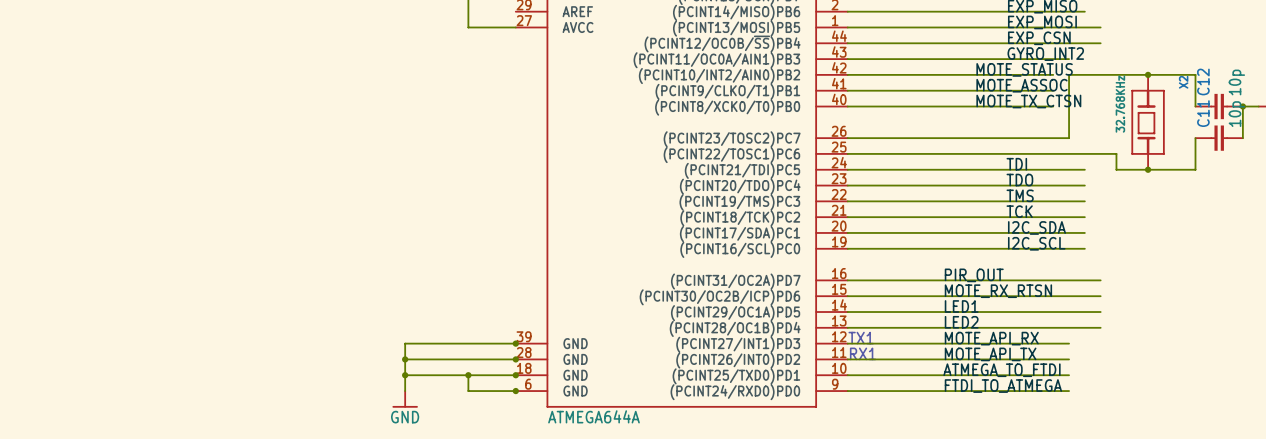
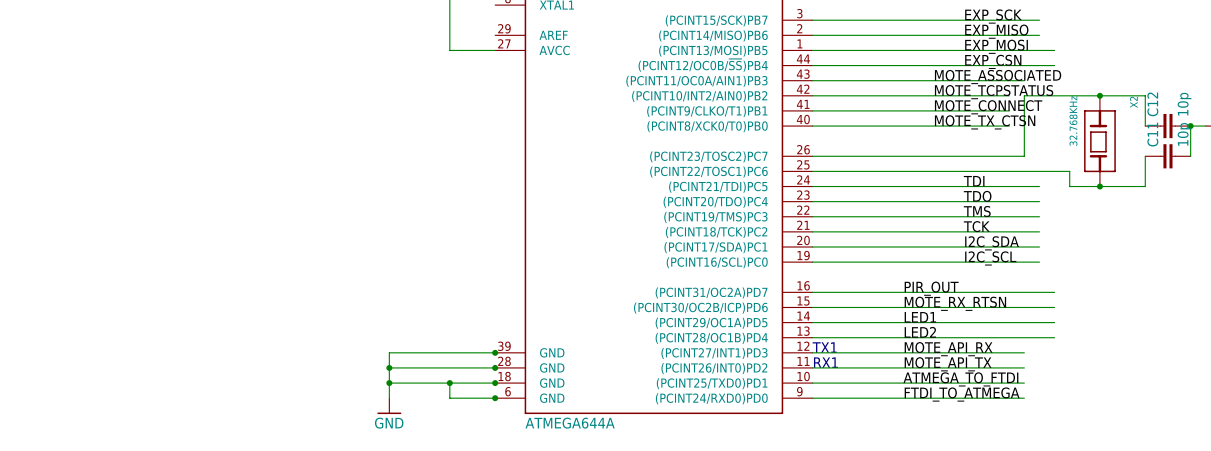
label: none -> MOTE_ASSOCIATED (998, 77)
label: GYRO_INT2 (1045, 54) -> none
label: MOTE_STATUS (1024, 69) -> MOTE_TCPSTATUS (994, 92)
label: MOTE_ASSOC (1021, 85) -> MOTE_CONNECT (988, 107)

